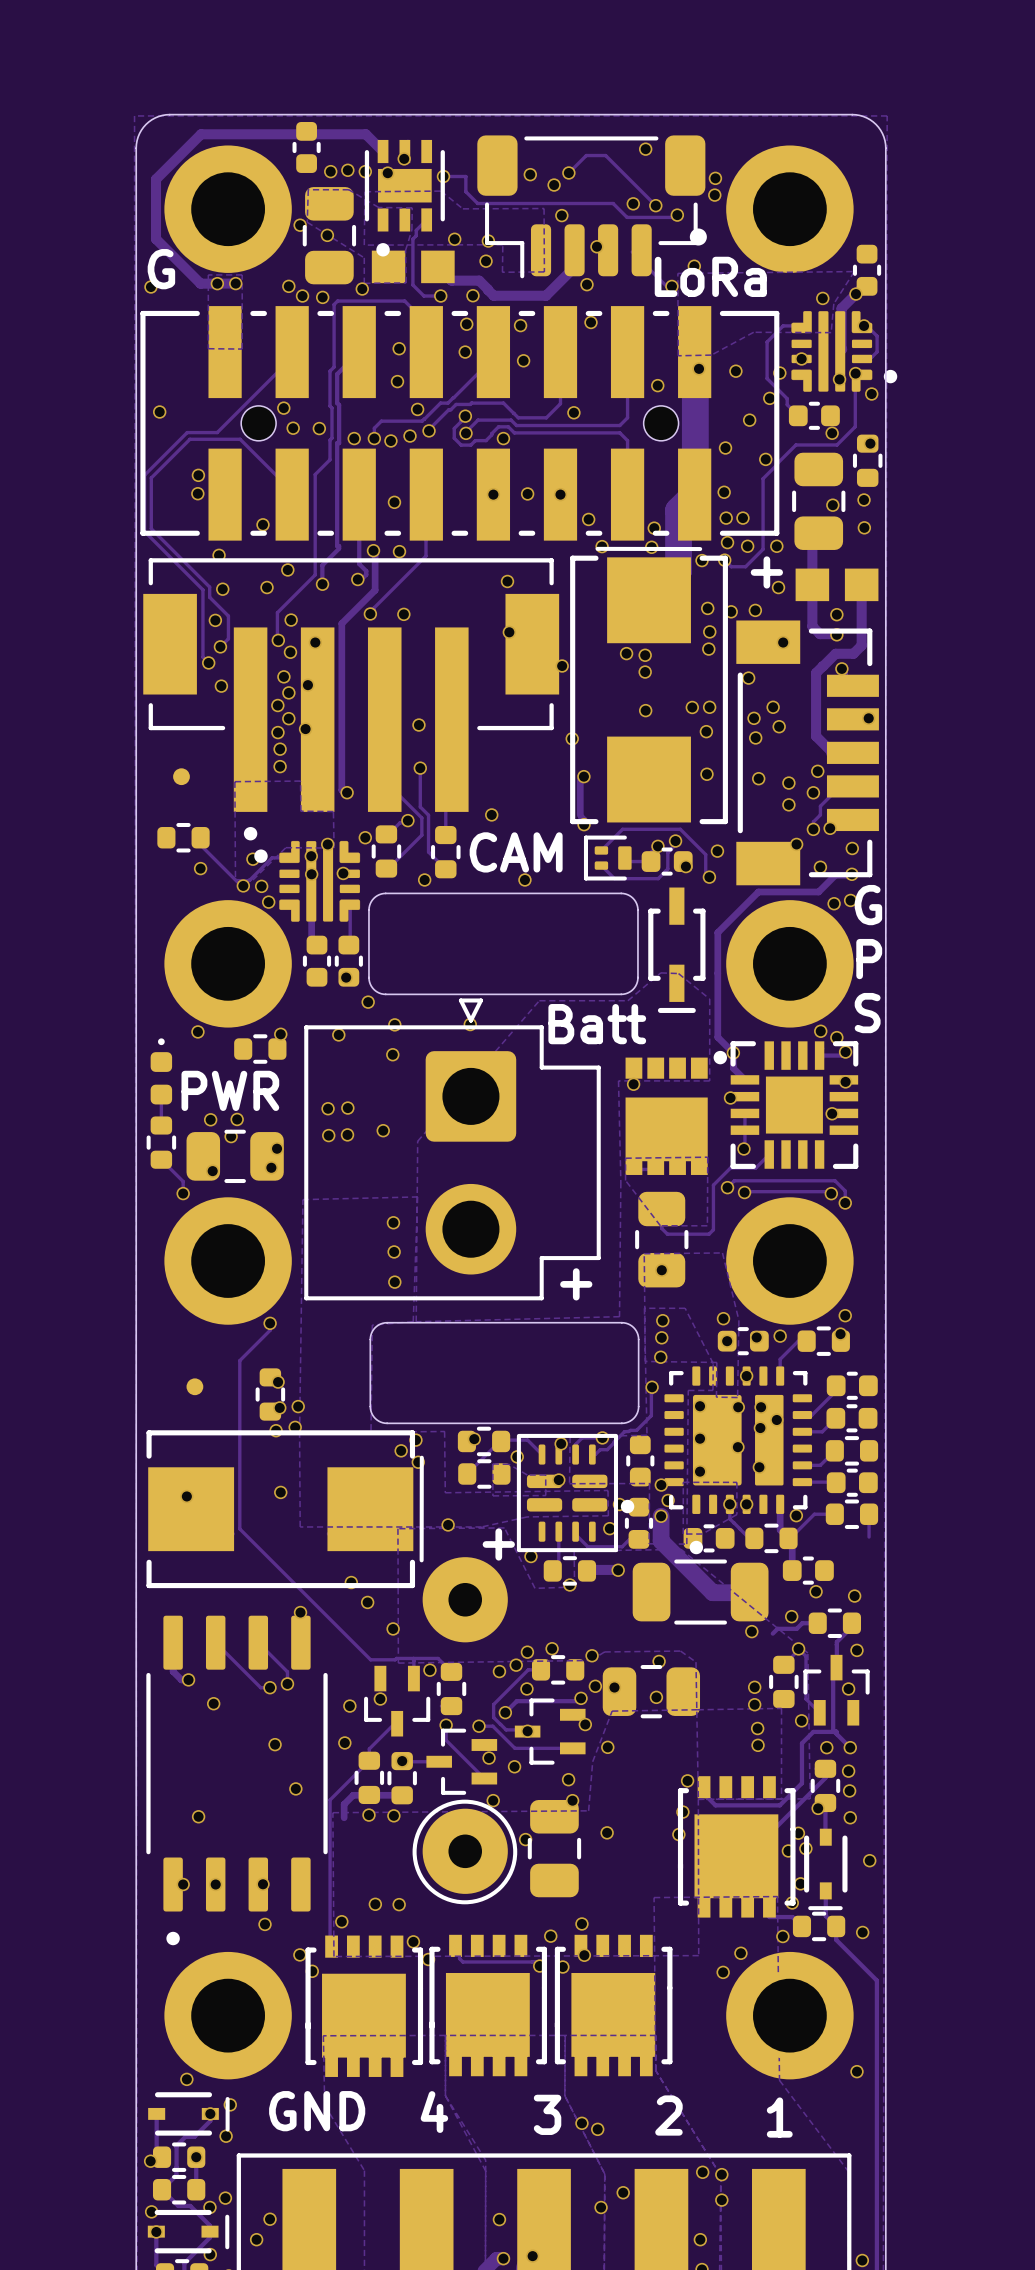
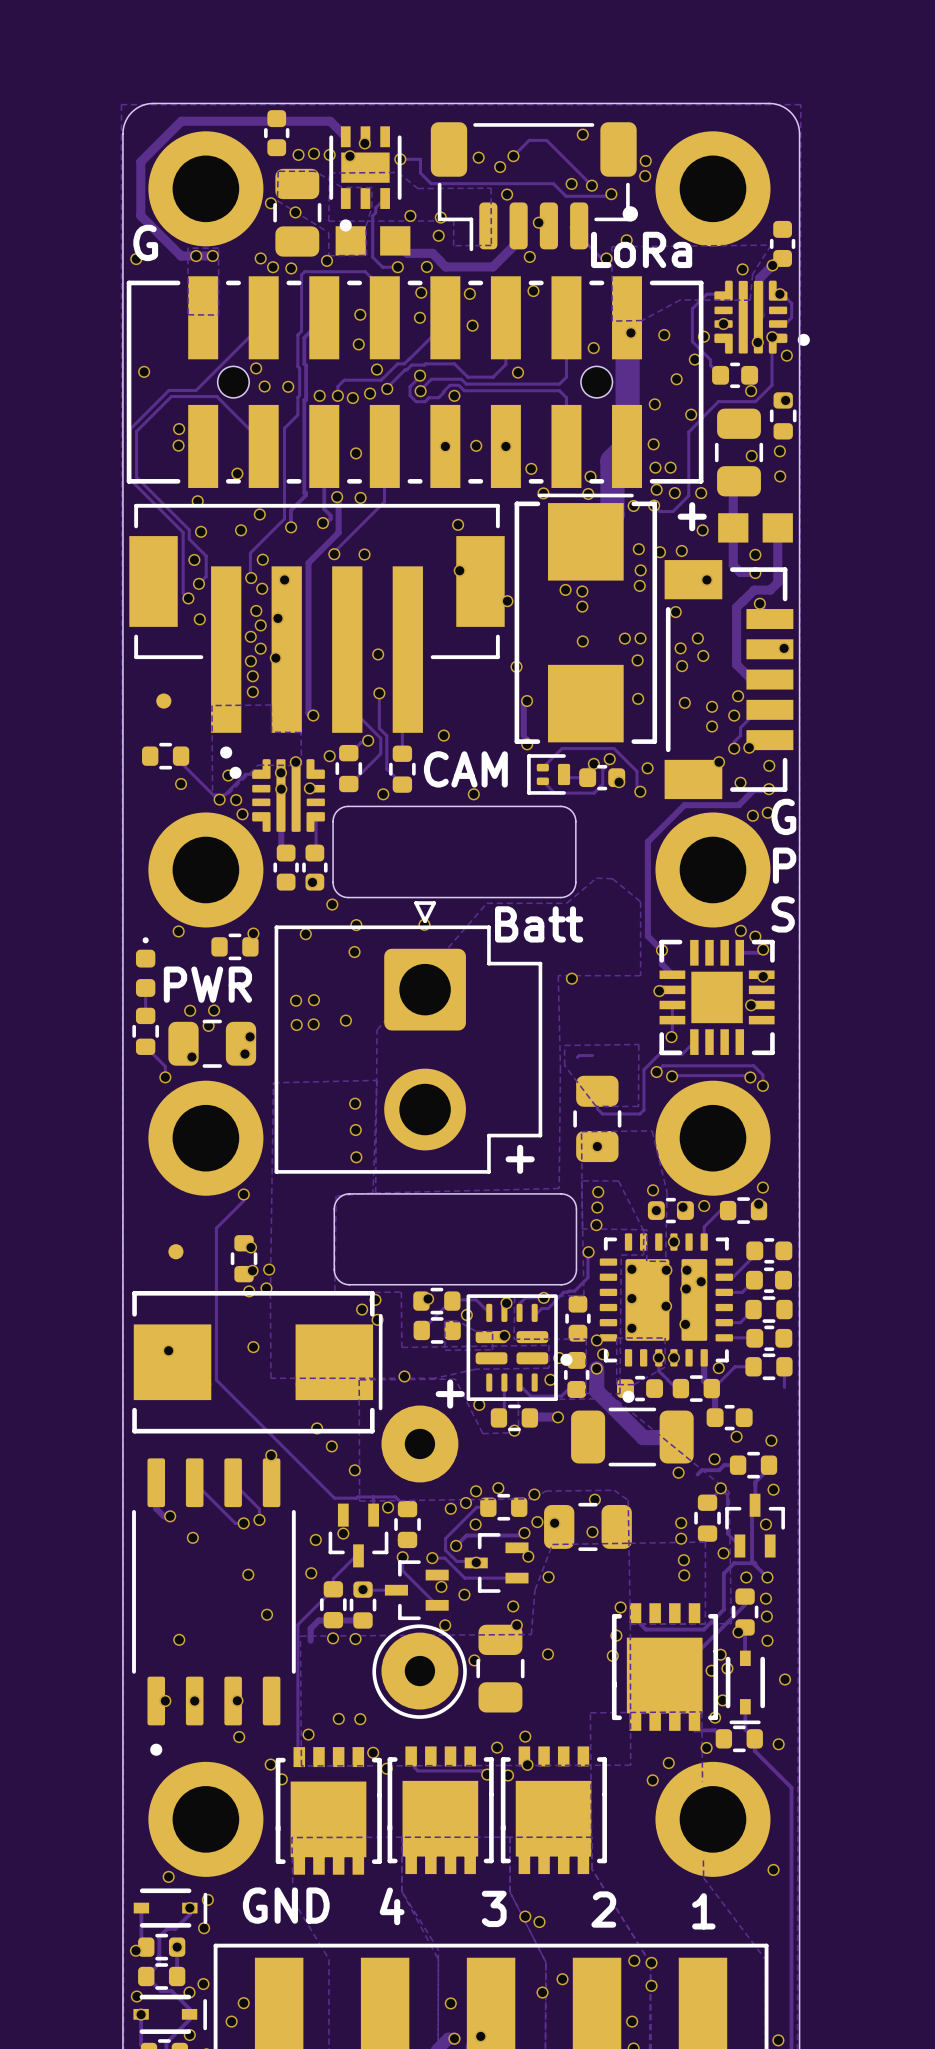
part: (676, 950) -> none
part: (676, 1112) -> none

